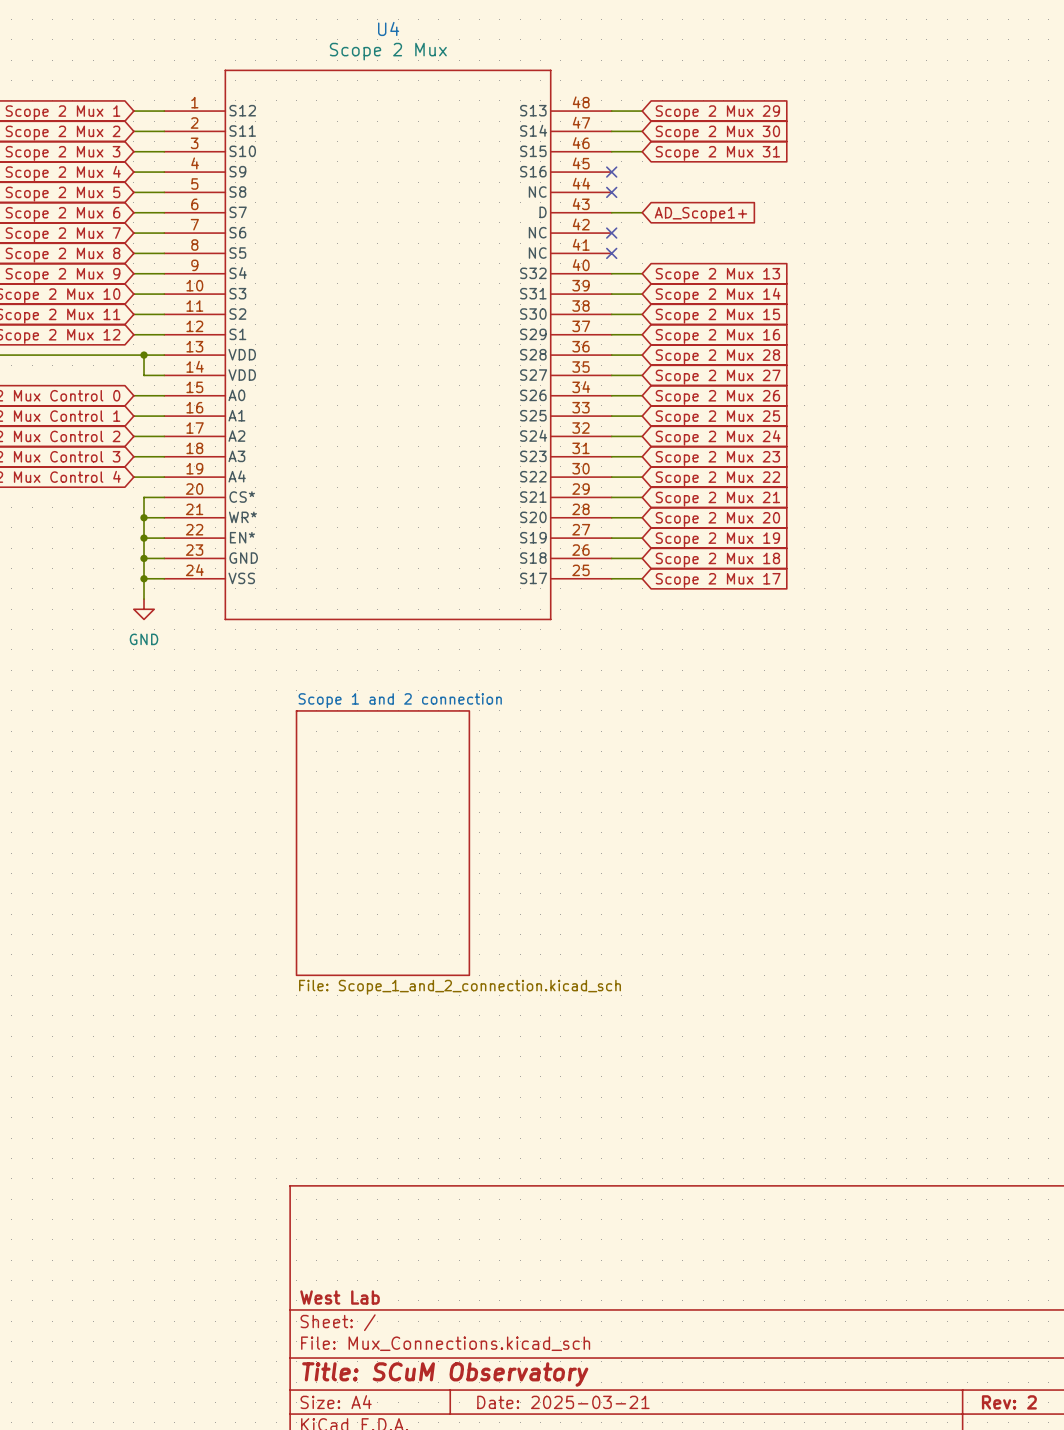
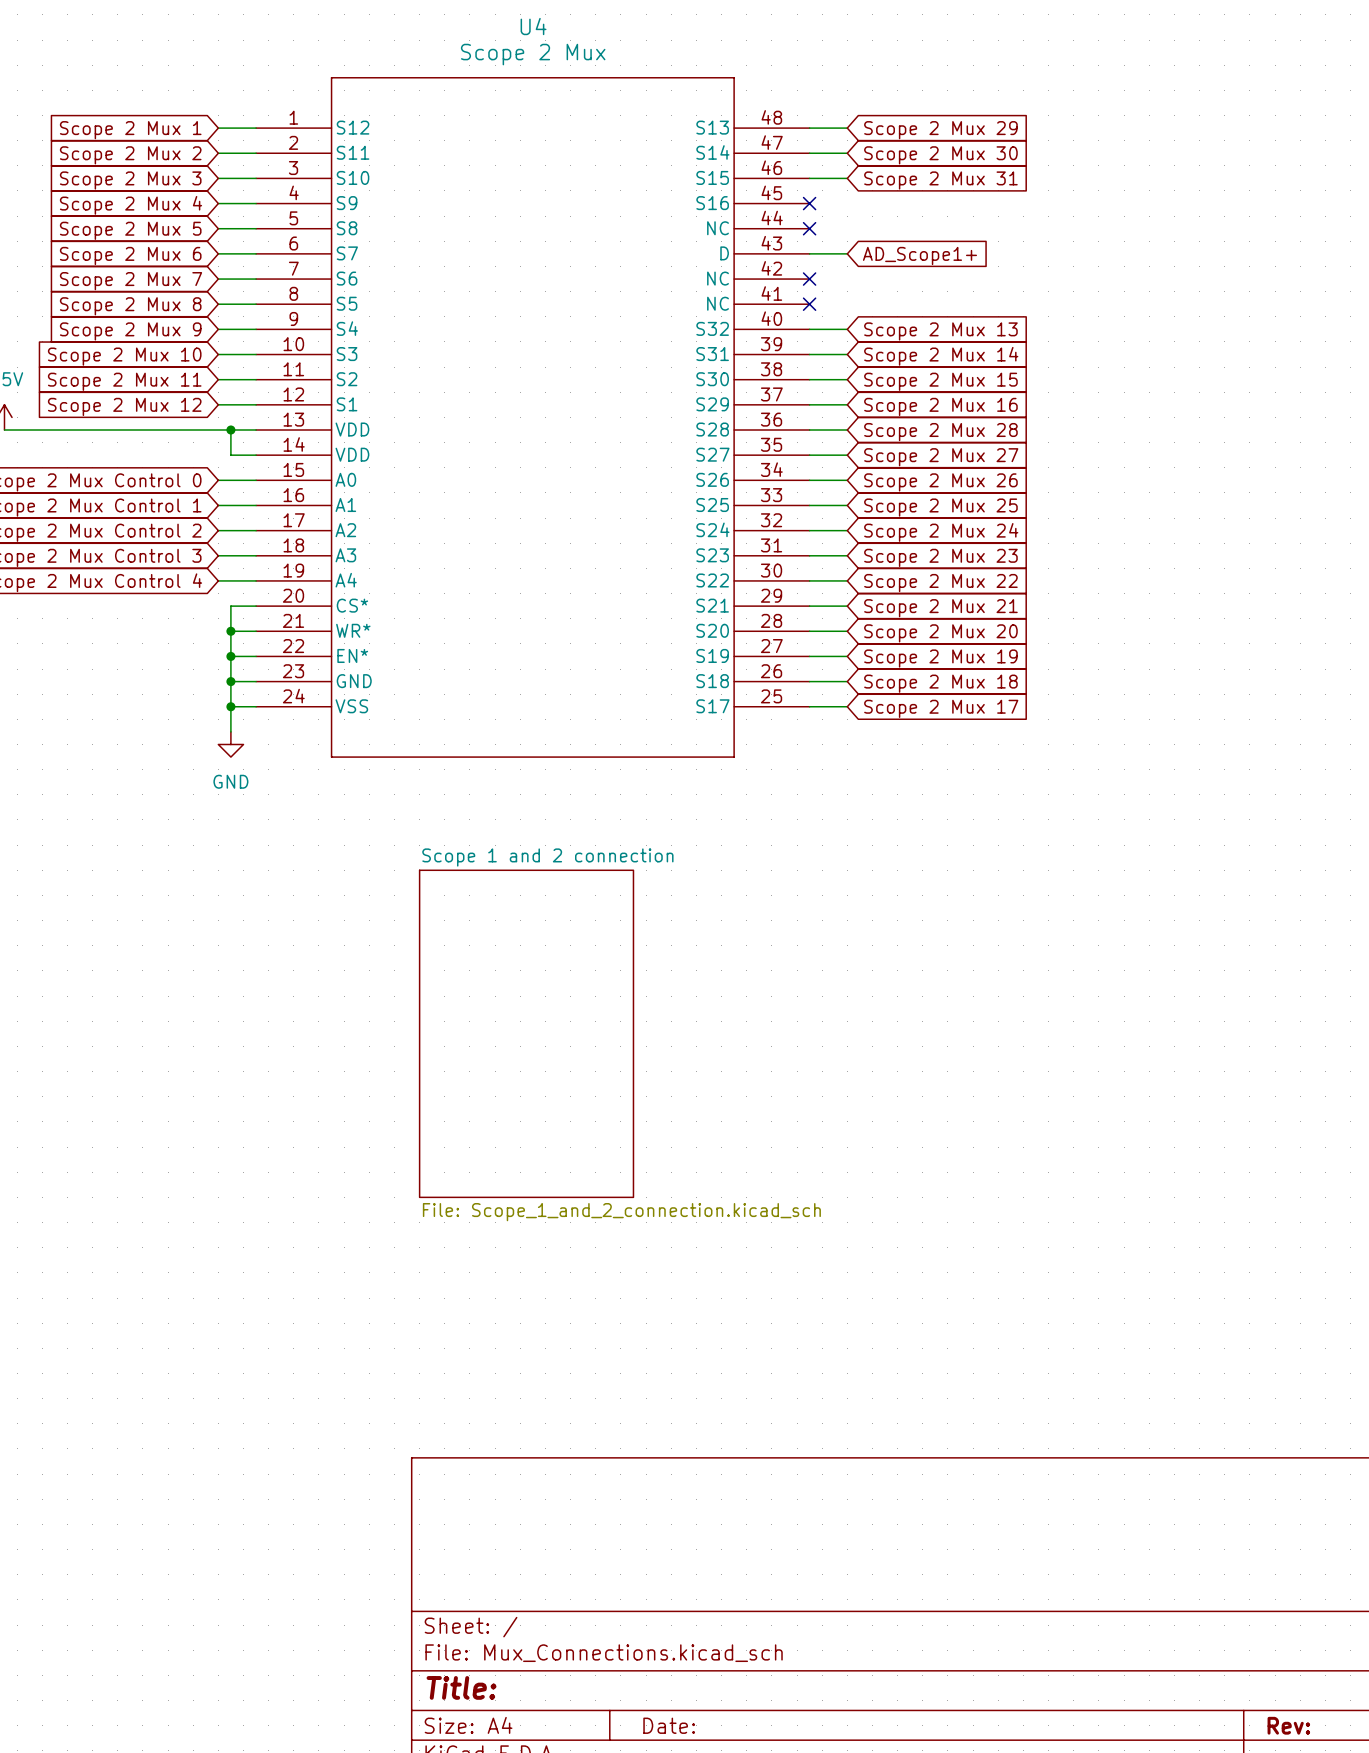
title block: West Lab (340, 1297) -> none
title block: Title: SCuM Observatory (445, 1374) -> Title: (461, 1687)
title block: Date: 2025-03-21 (563, 1402) -> Date: (669, 1725)
title block: Rev: 2 (1009, 1402) -> Rev: (1288, 1725)

